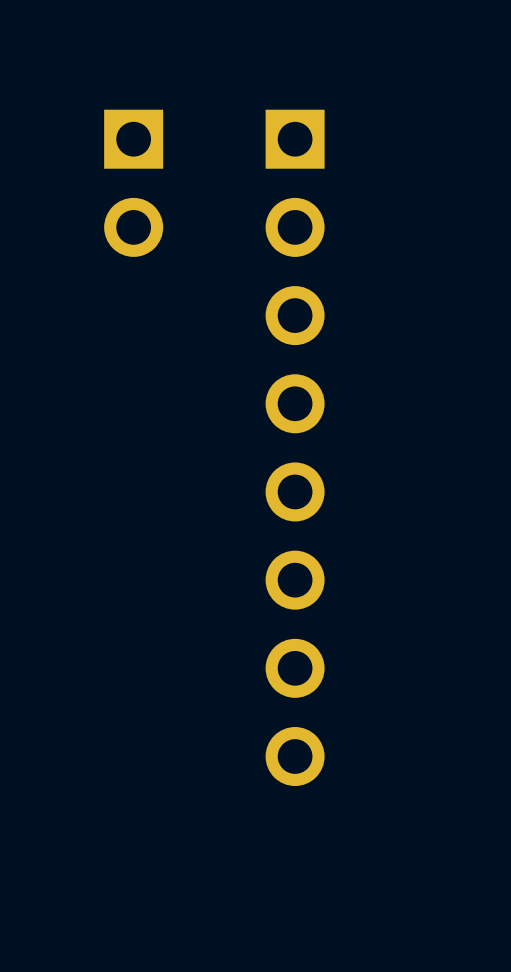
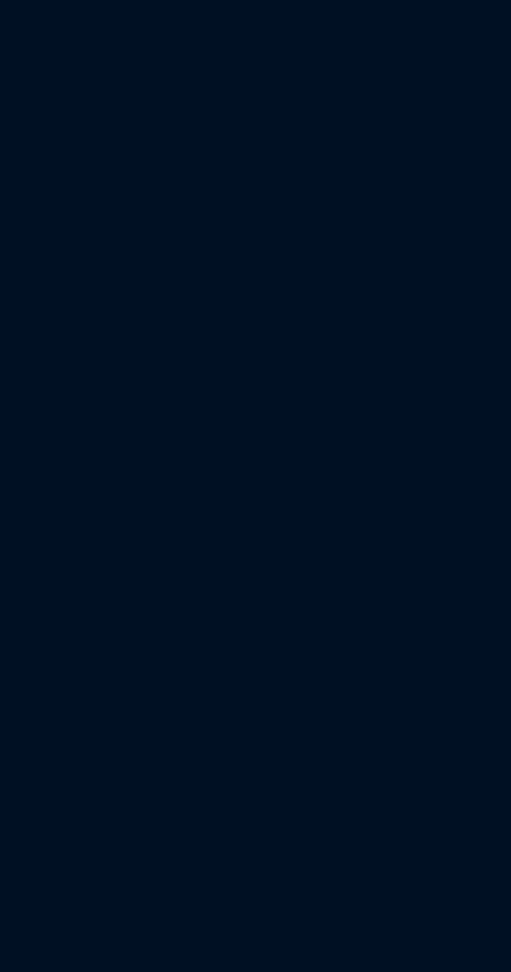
part: (133, 183) -> none
part: (295, 447) -> none

